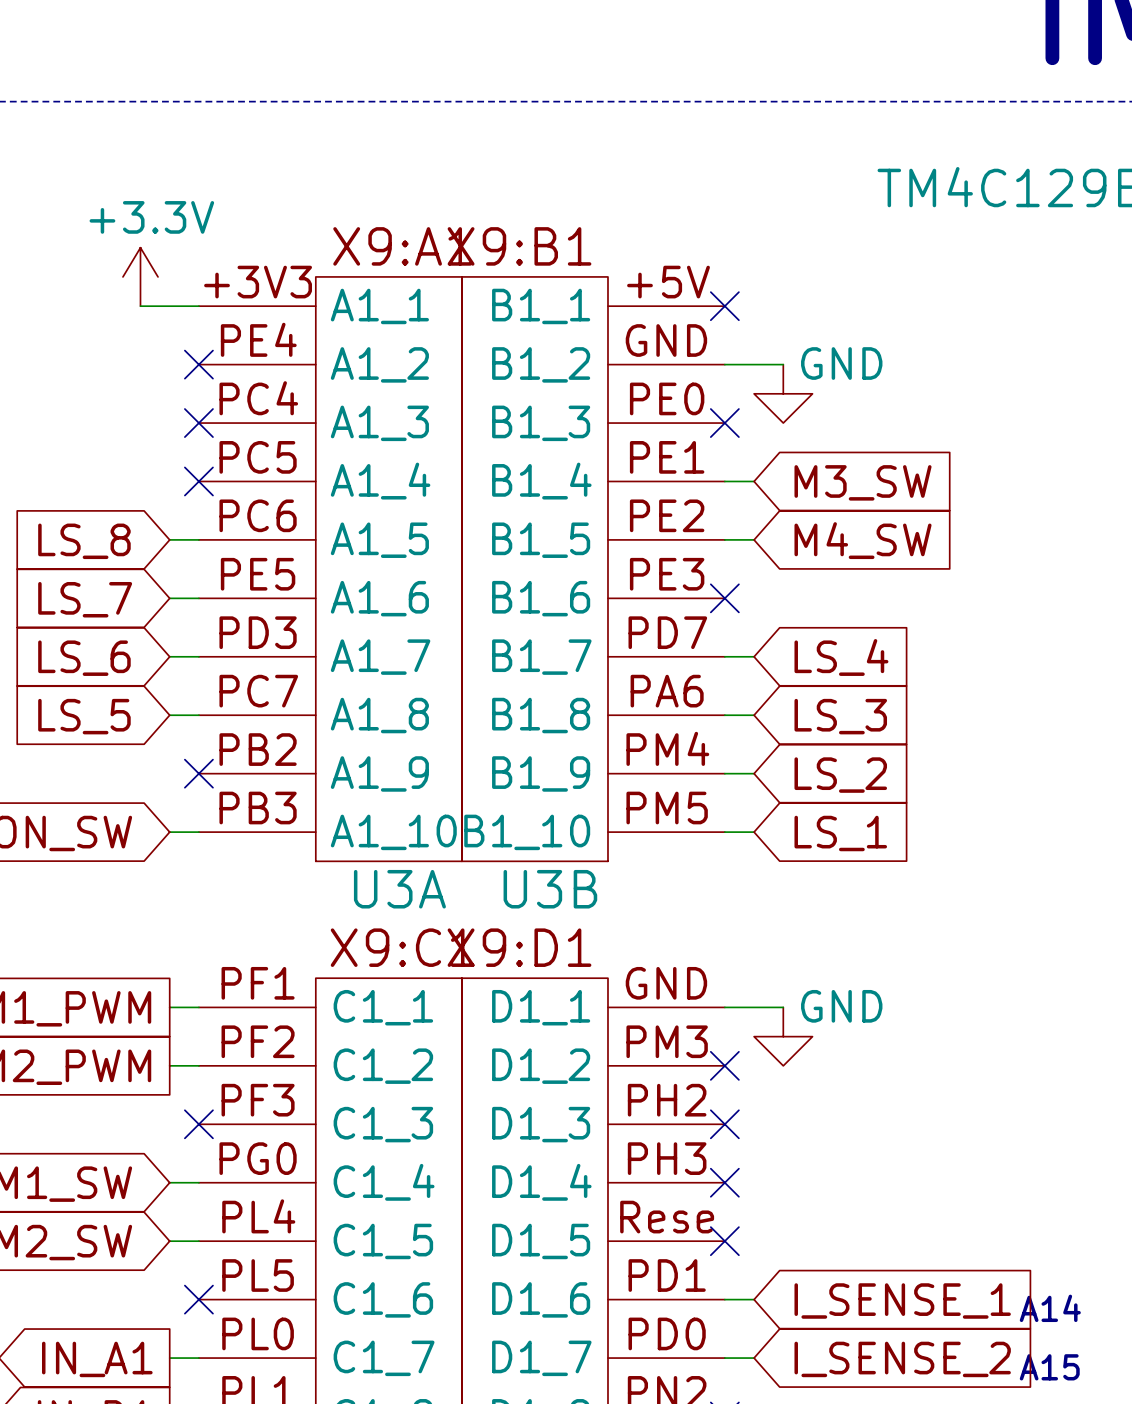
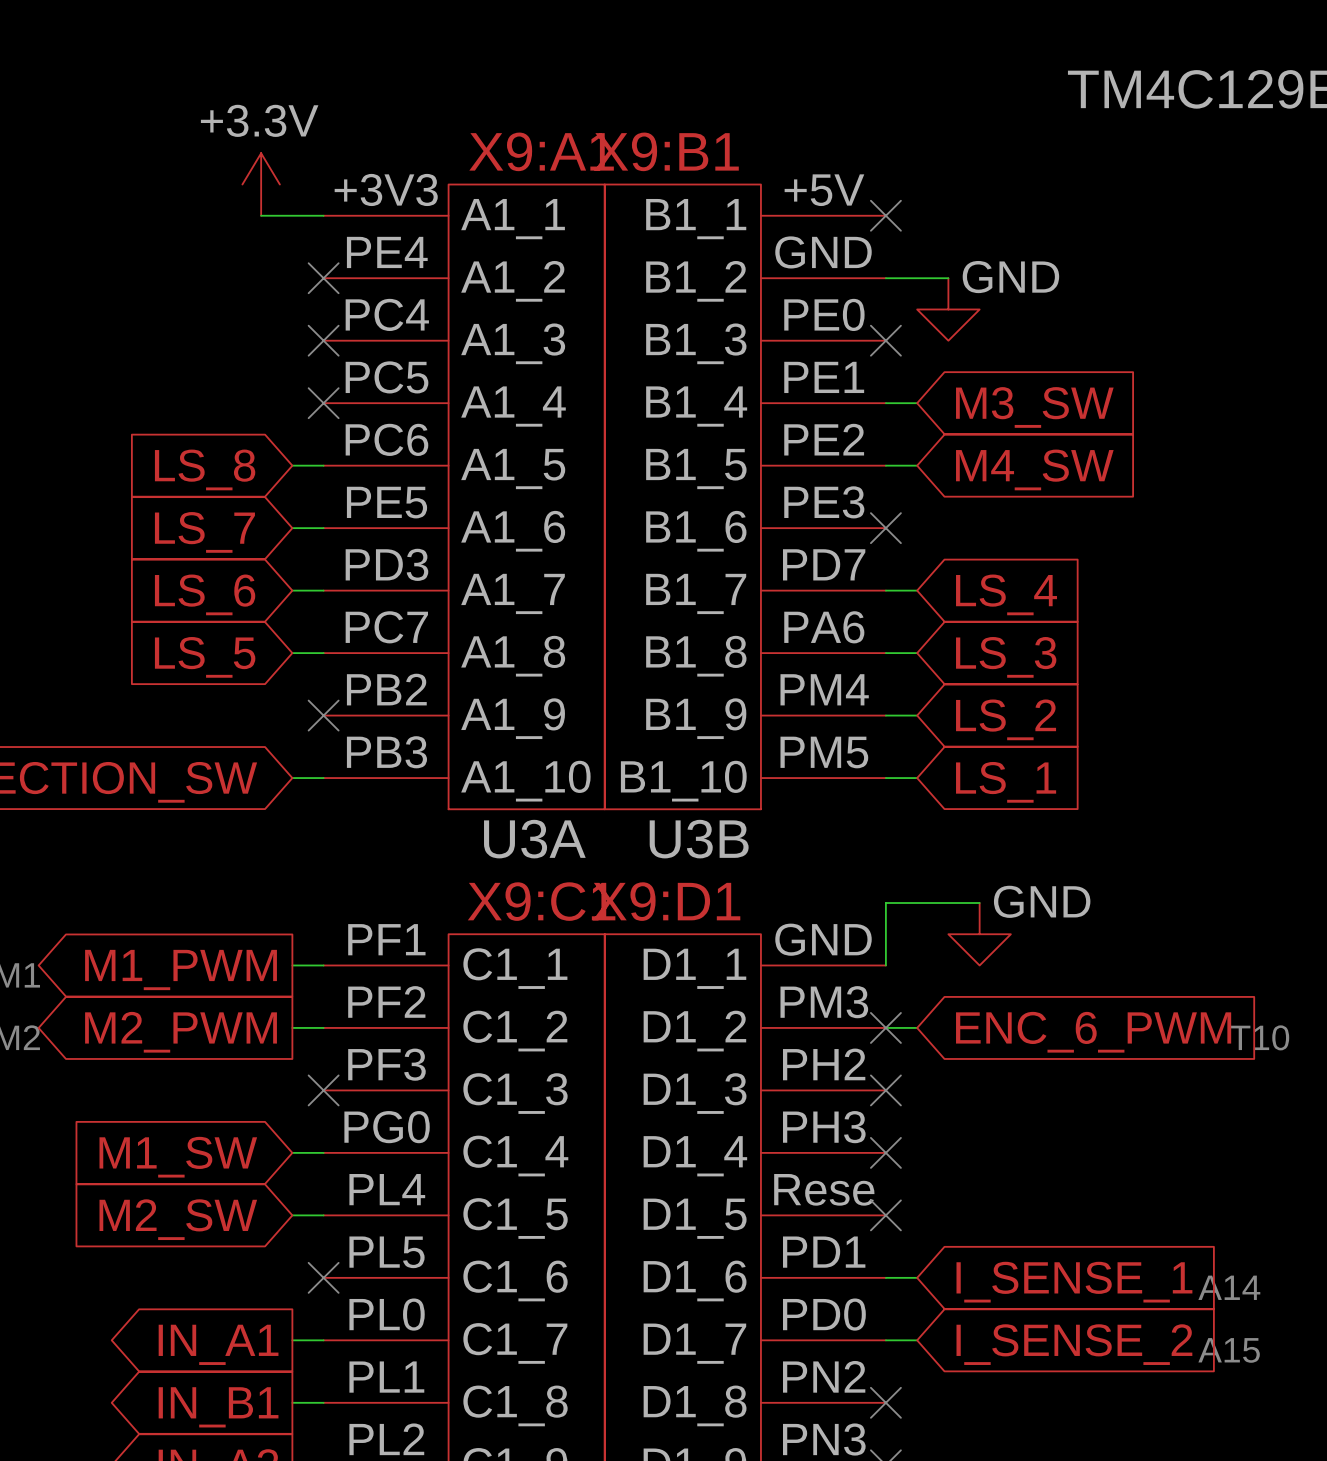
wire: (724, 1007) (783, 1007) -> (885, 965) (885, 903) (979, 903)
power symbol position: GND (783, 1036) -> GND (979, 934)
wire: none -> (885, 1027) (917, 1027)
global label: none -> ENC_6_PWM (1093, 1032)
text: none -> T10 (1259, 1037)

